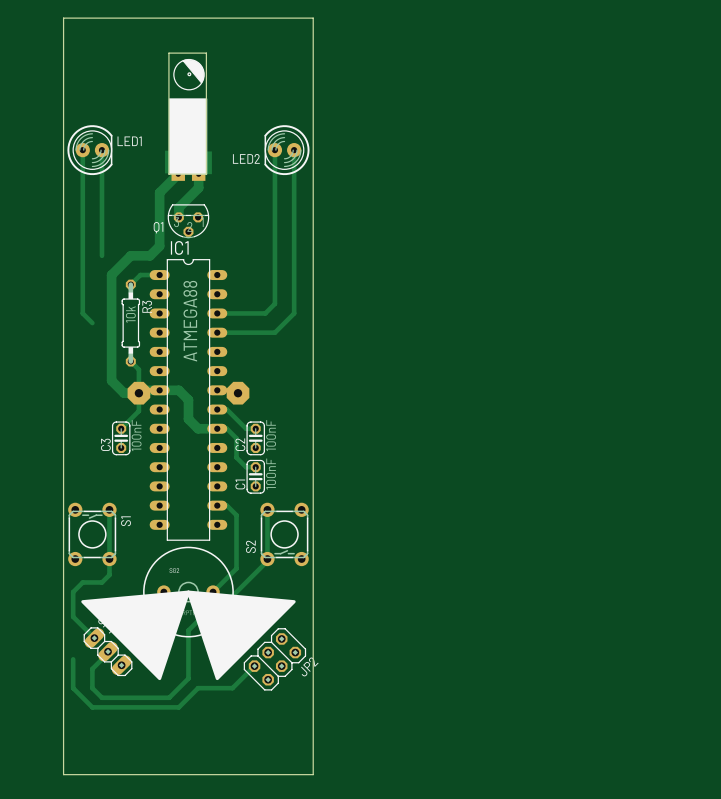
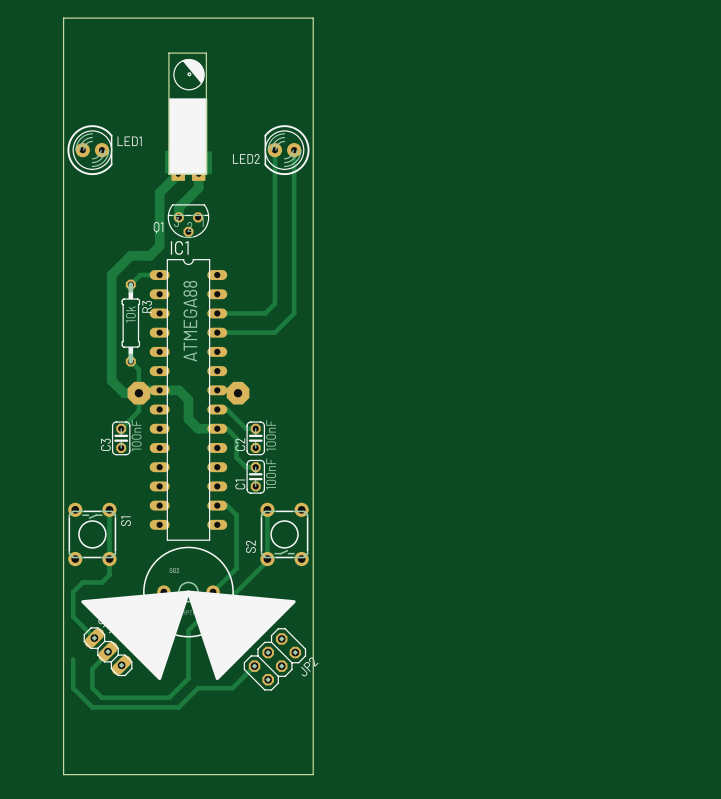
track: (82, 150) (82, 313) (92, 323) -> none
track: (102, 150) (102, 255) -> none

